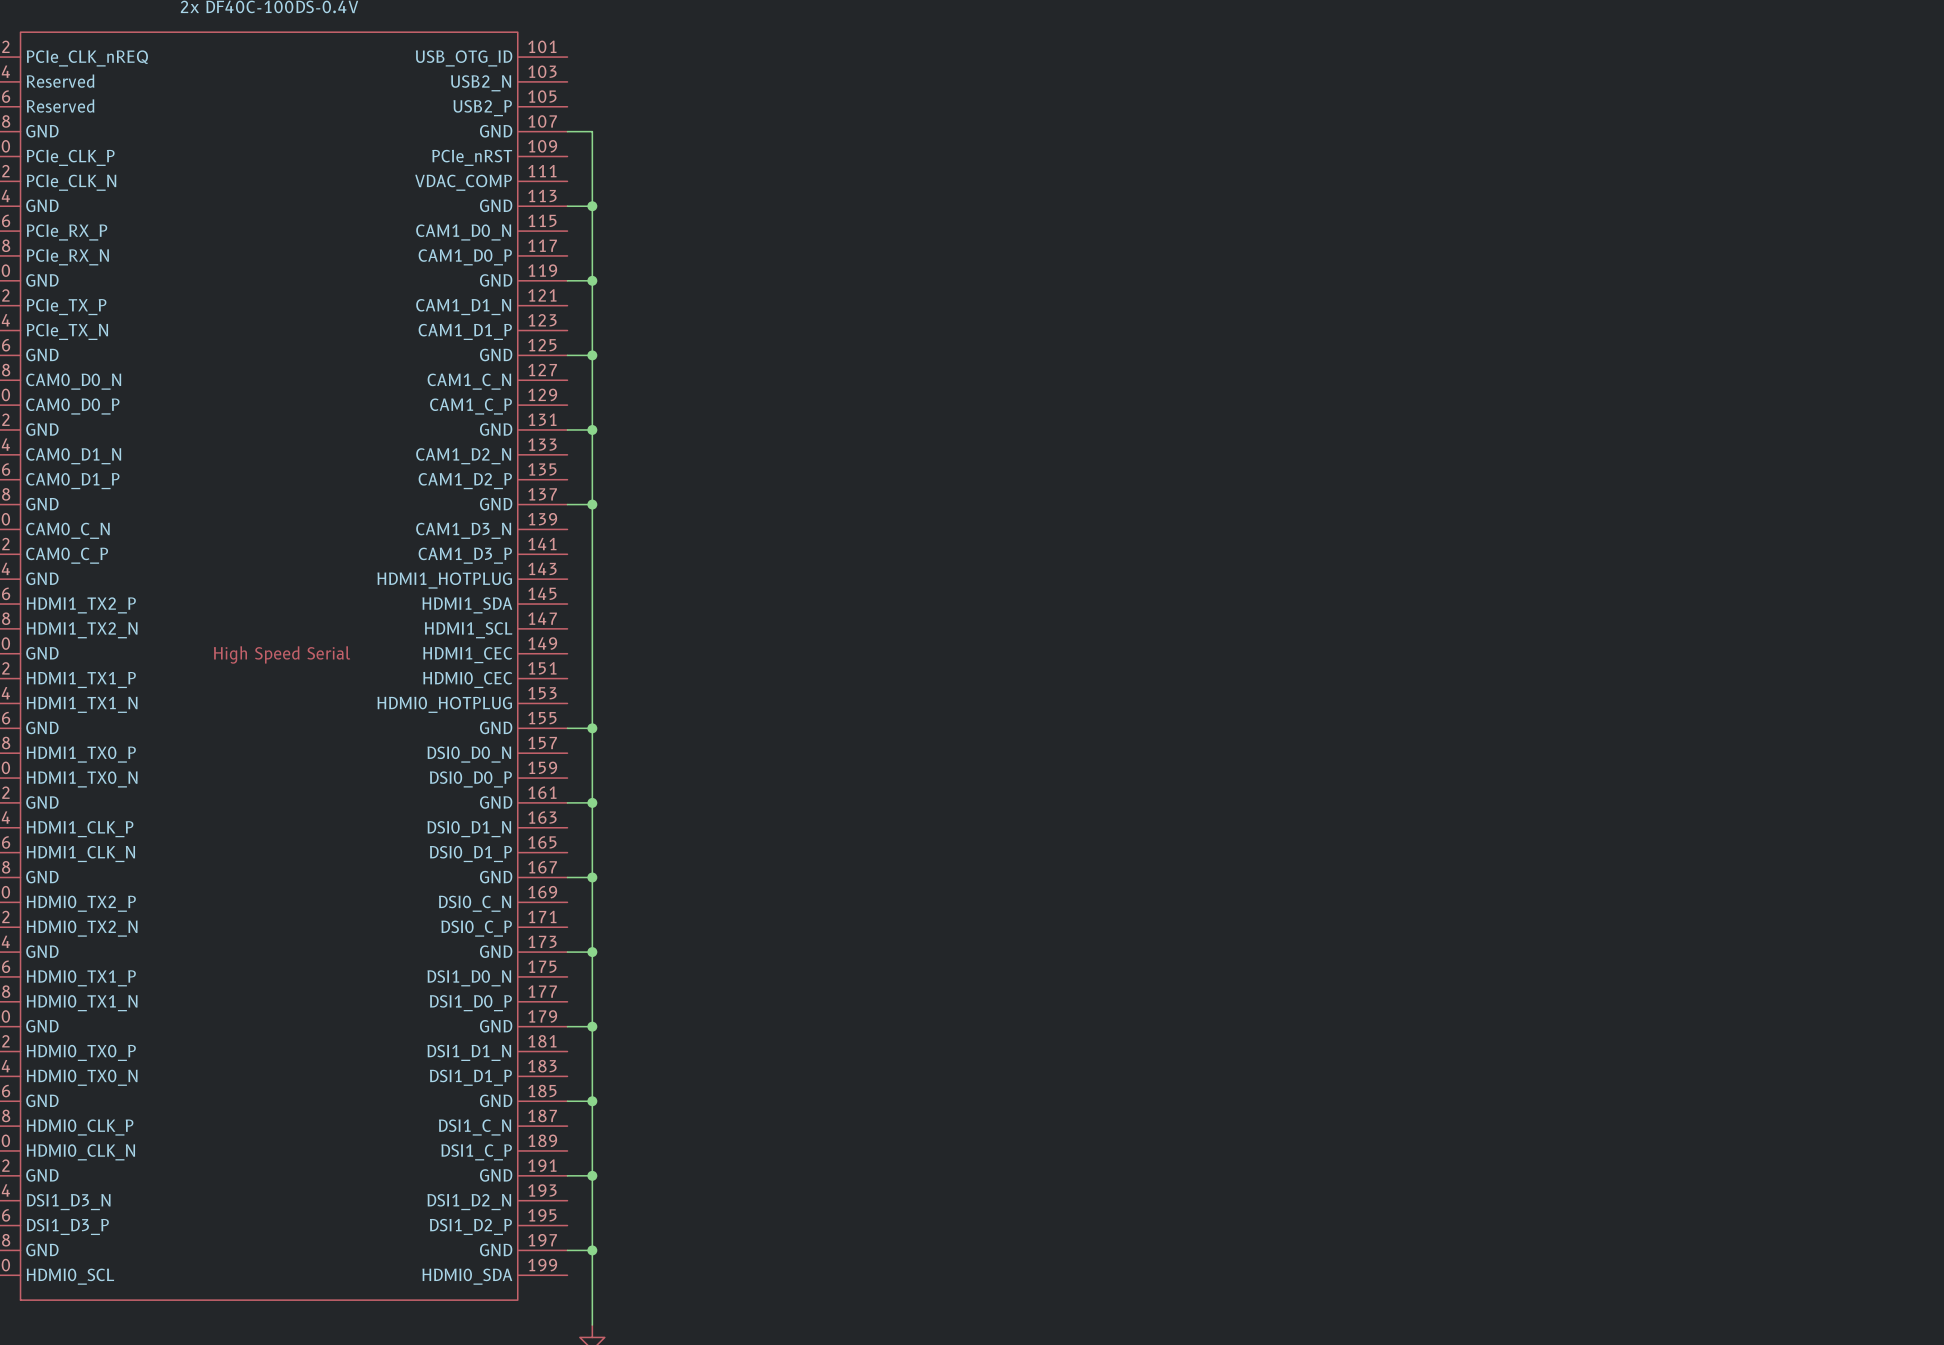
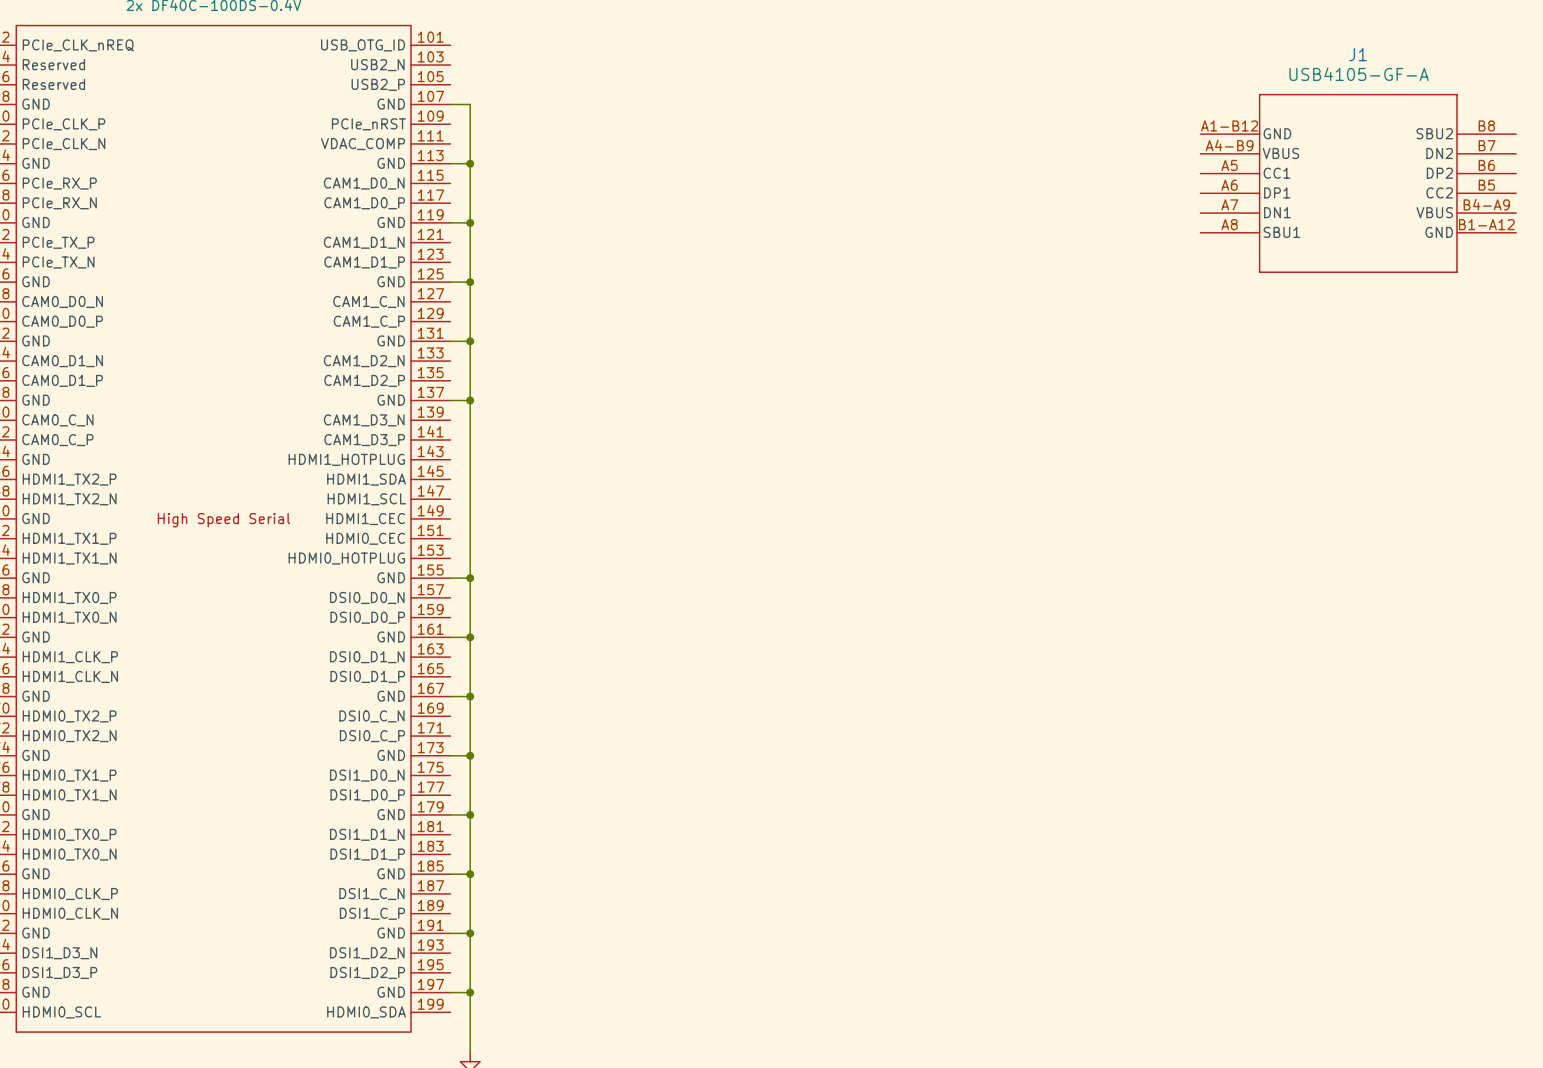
J1: none -> USB4105-GF-A (1358, 183)

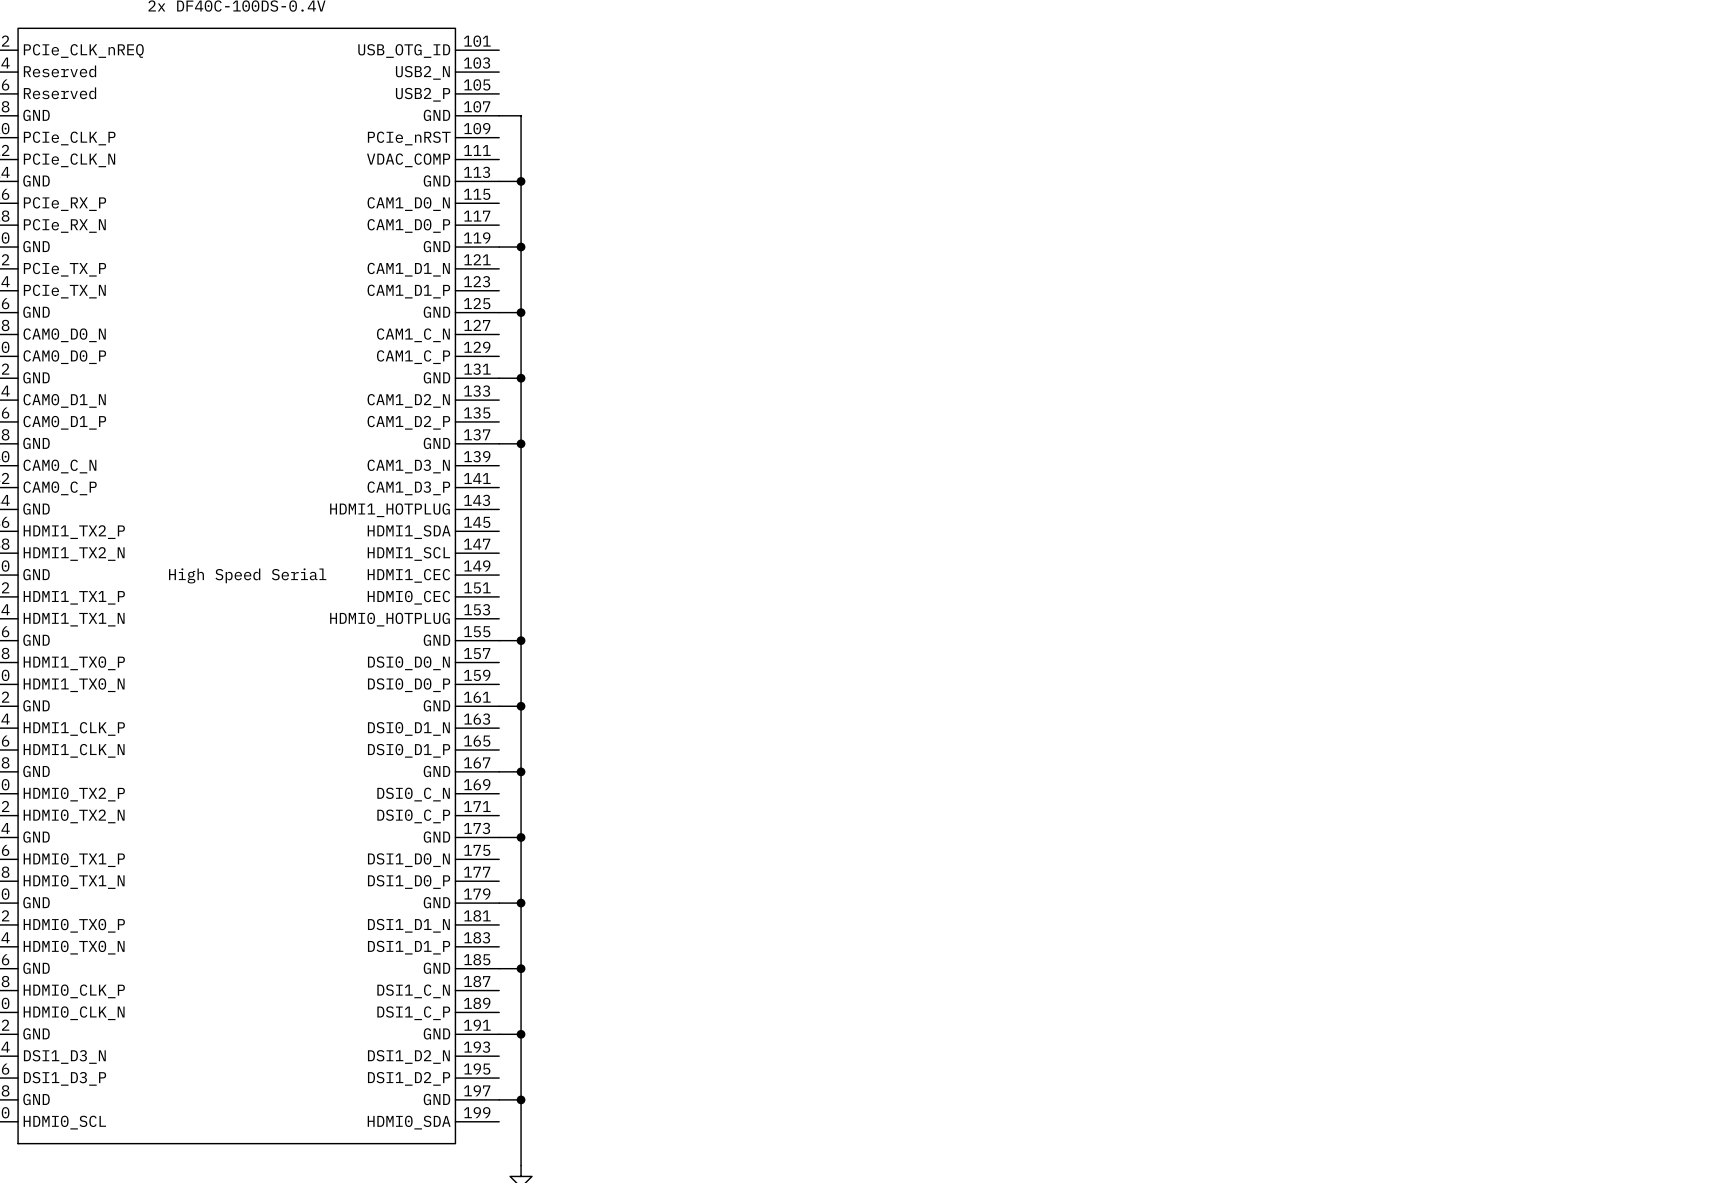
J1: USB4105-GF-A (1358, 183) -> none

